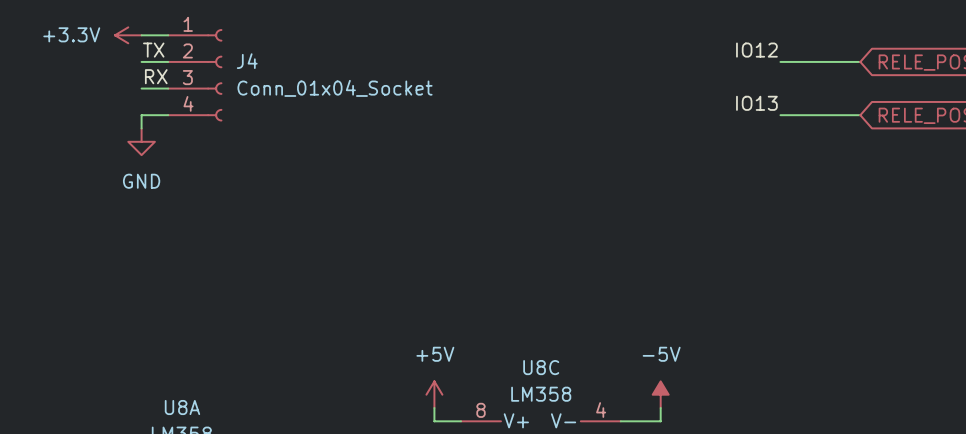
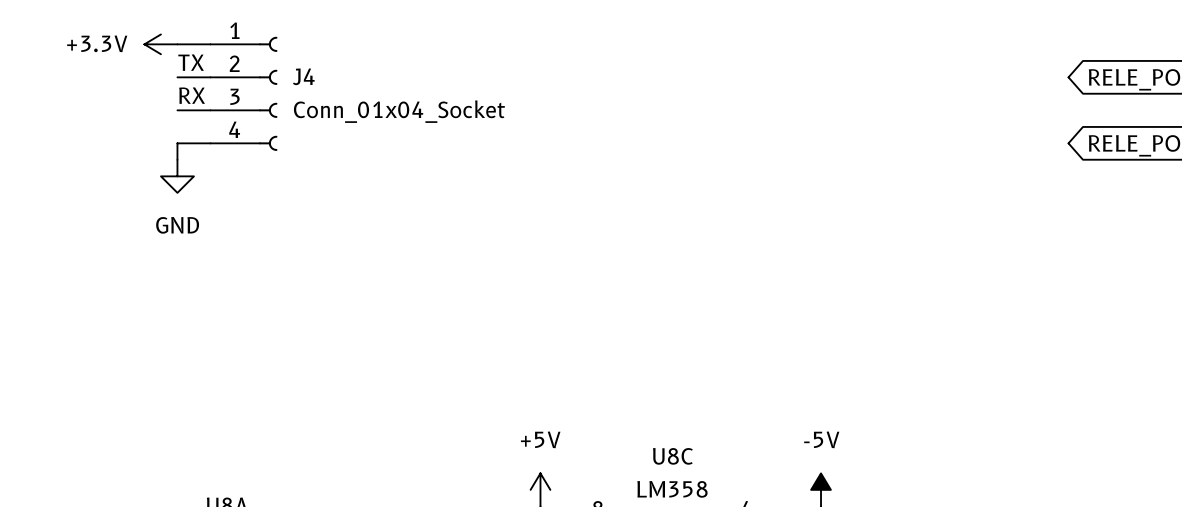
label: IO12 (756, 50) -> none
wire: (780, 61) (860, 61) -> none
label: IO13 (756, 103) -> none
wire: (780, 115) (860, 115) -> none

